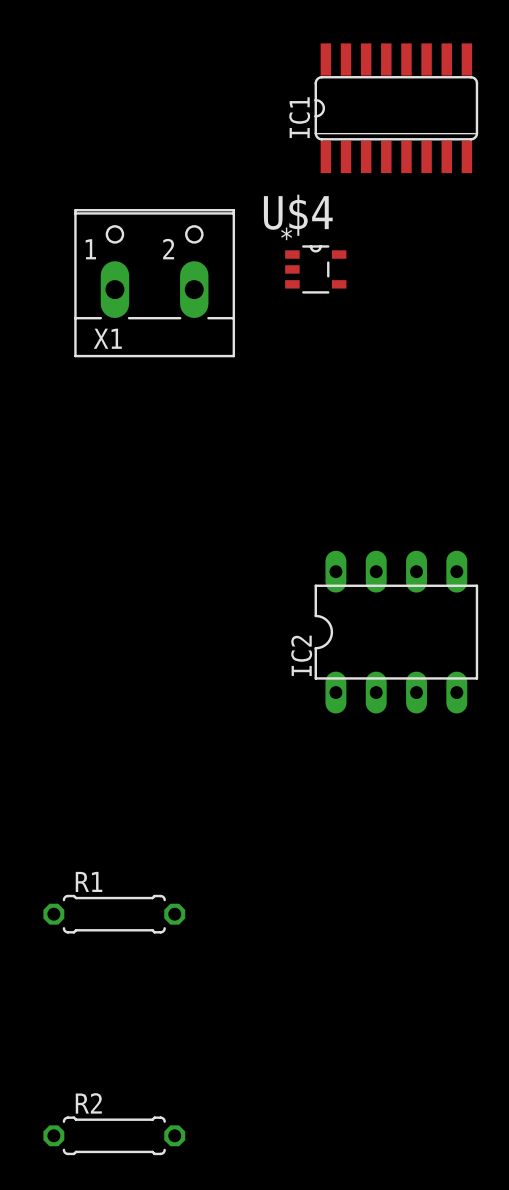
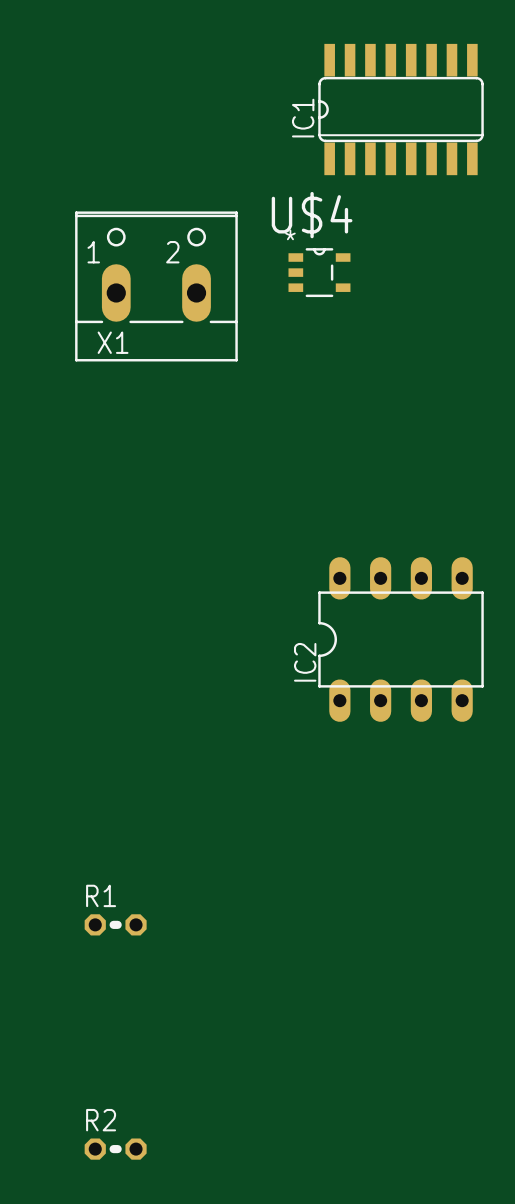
R1 footprint: [43, 894, 186, 934] -> [84, 914, 147, 936]
R2 footprint: [43, 1116, 186, 1156] -> [84, 1138, 147, 1160]

